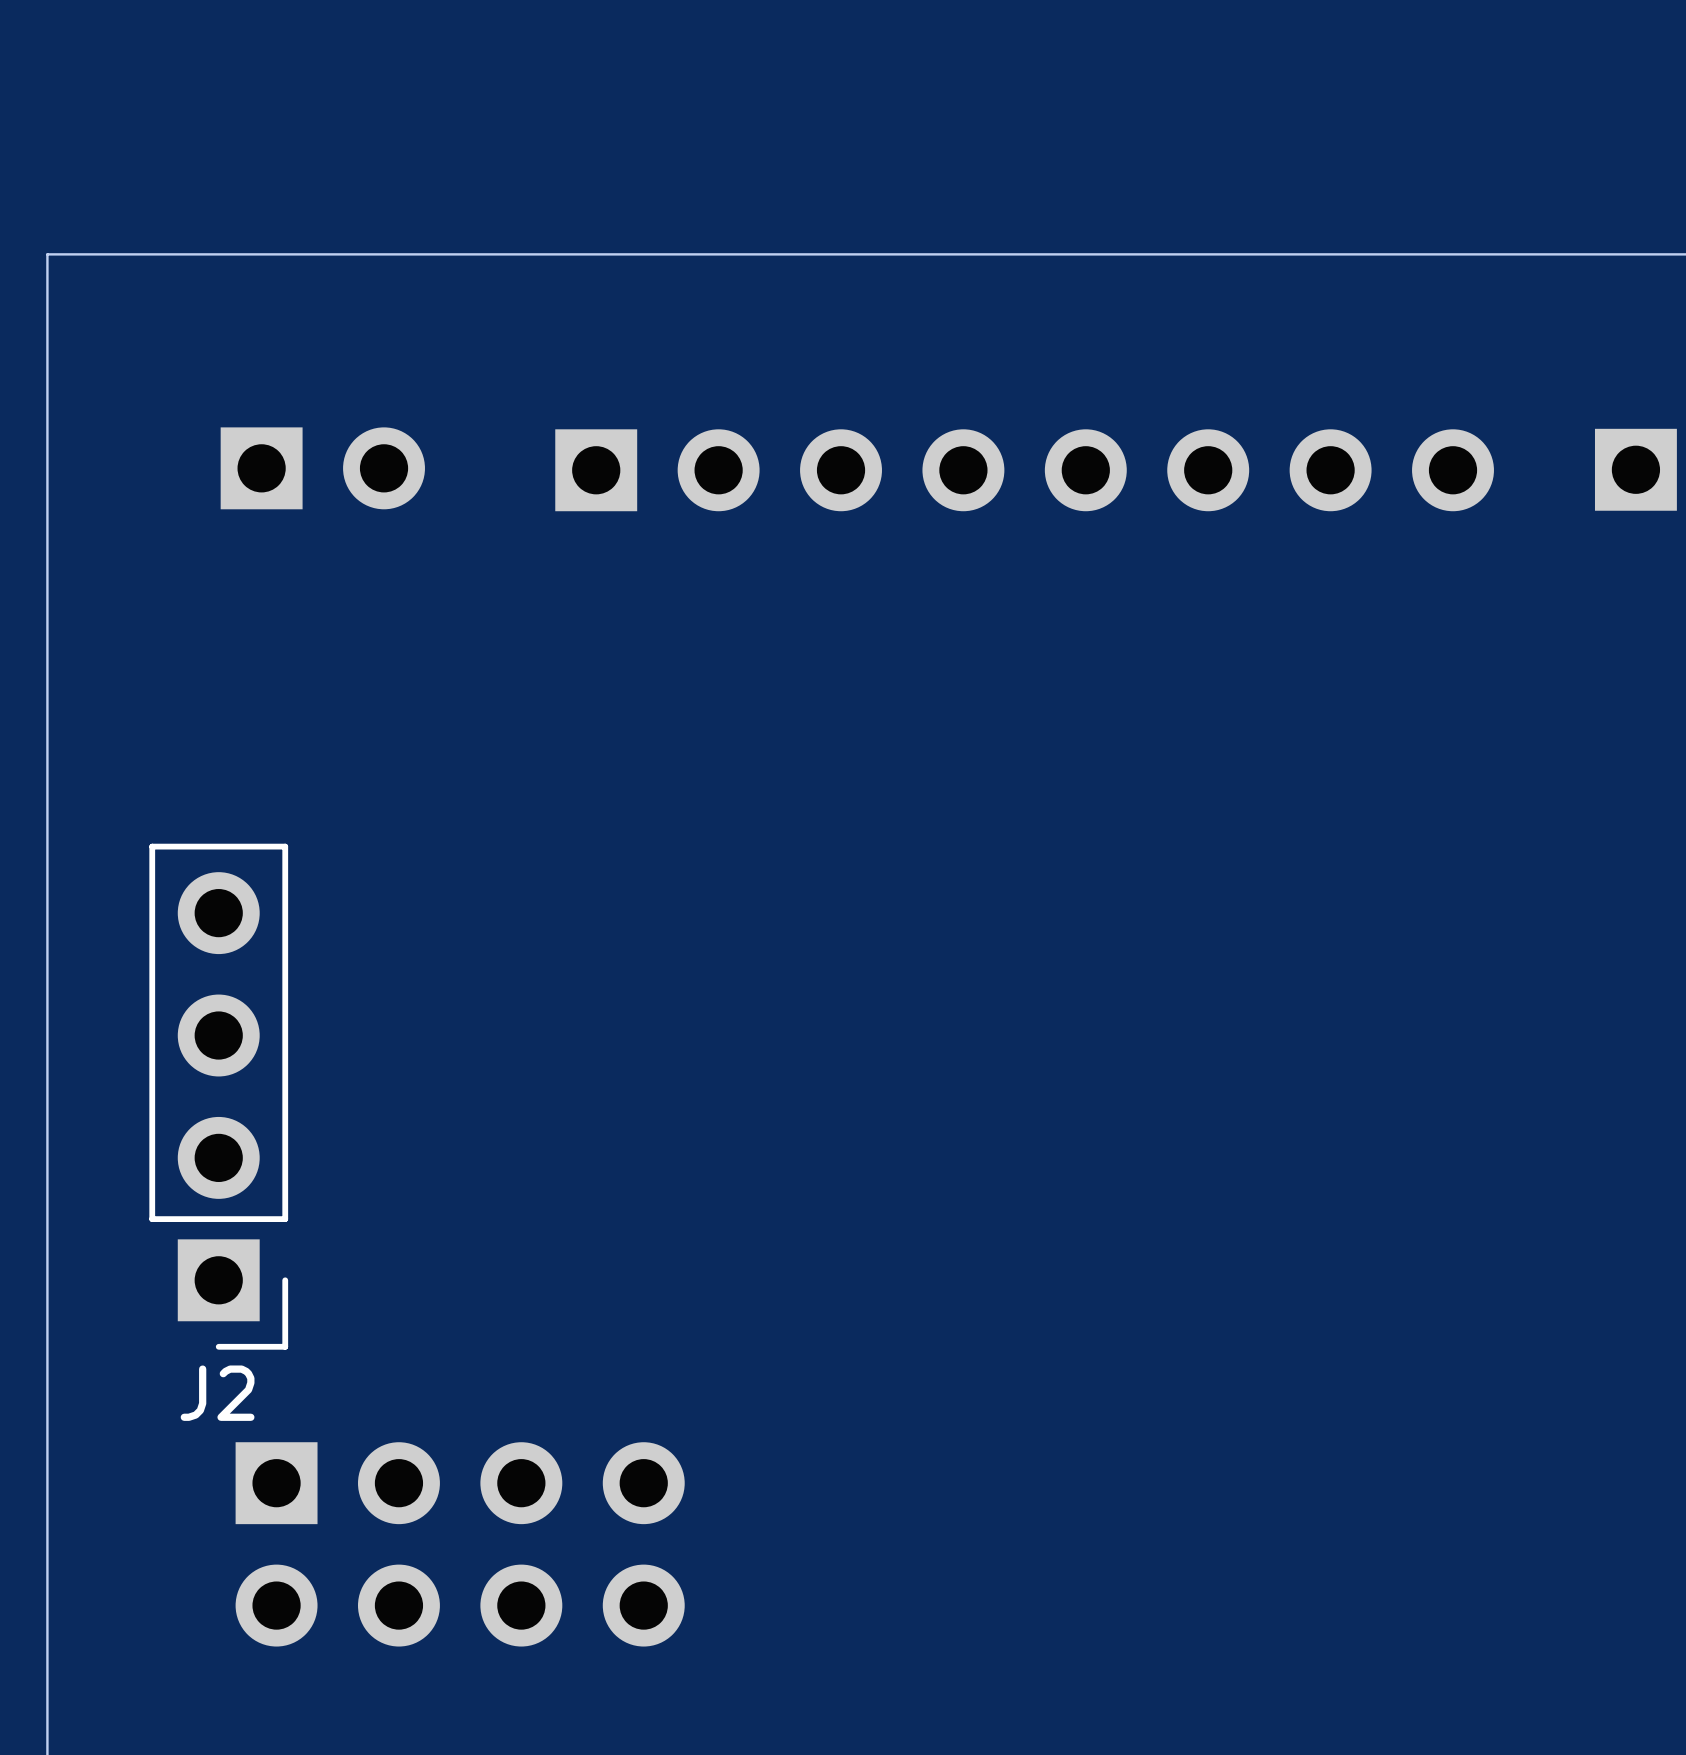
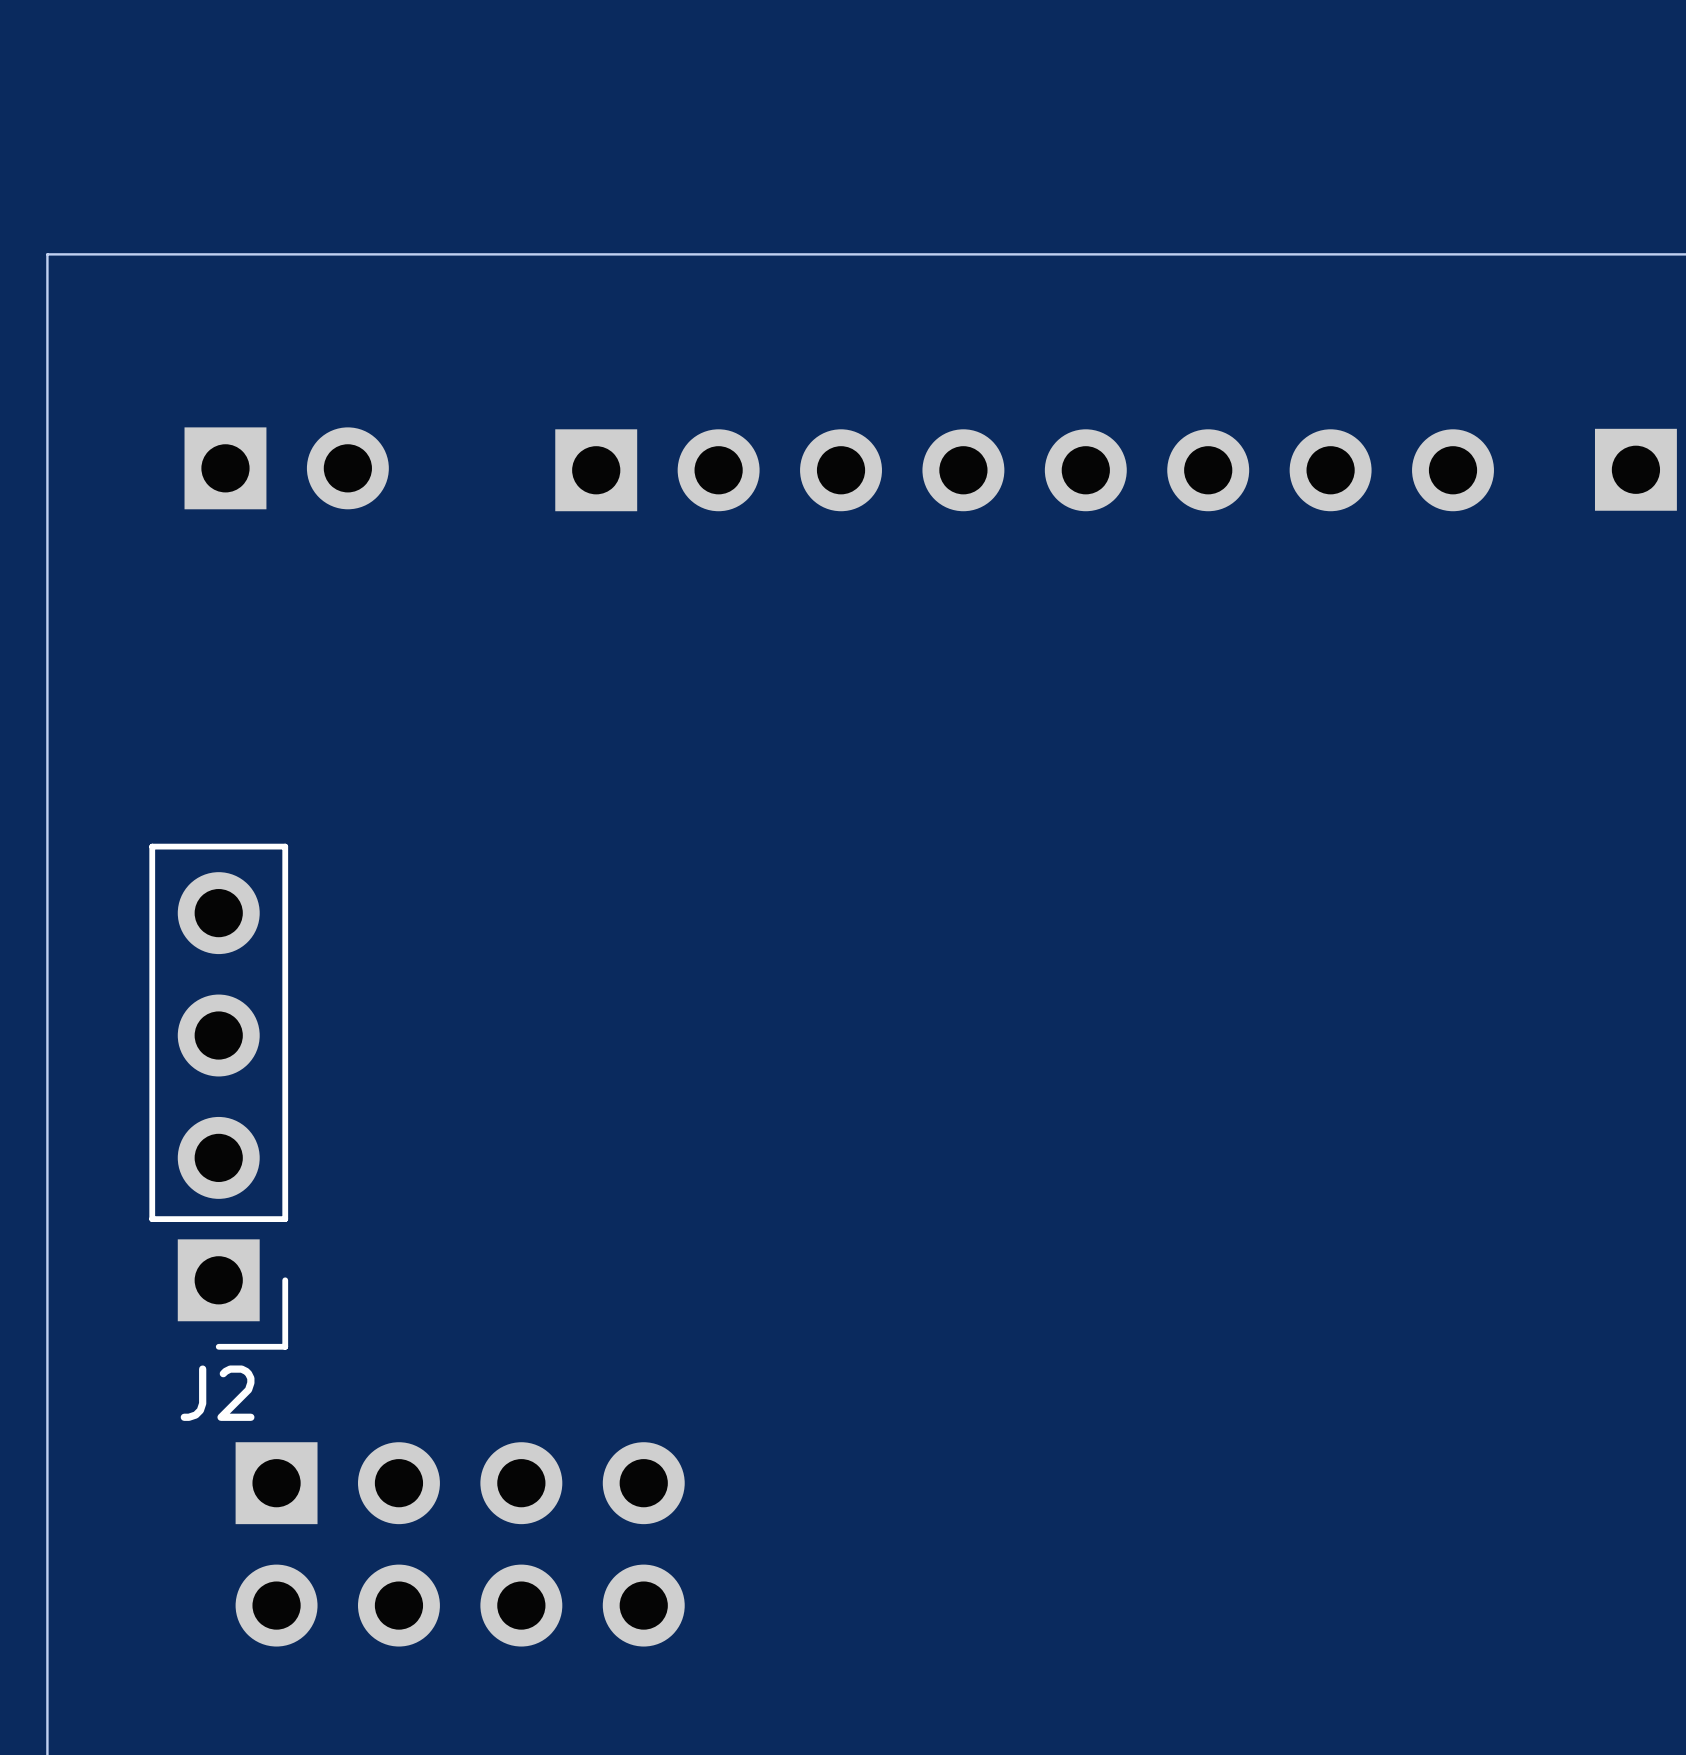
part position: (322, 468) -> (286, 468)

